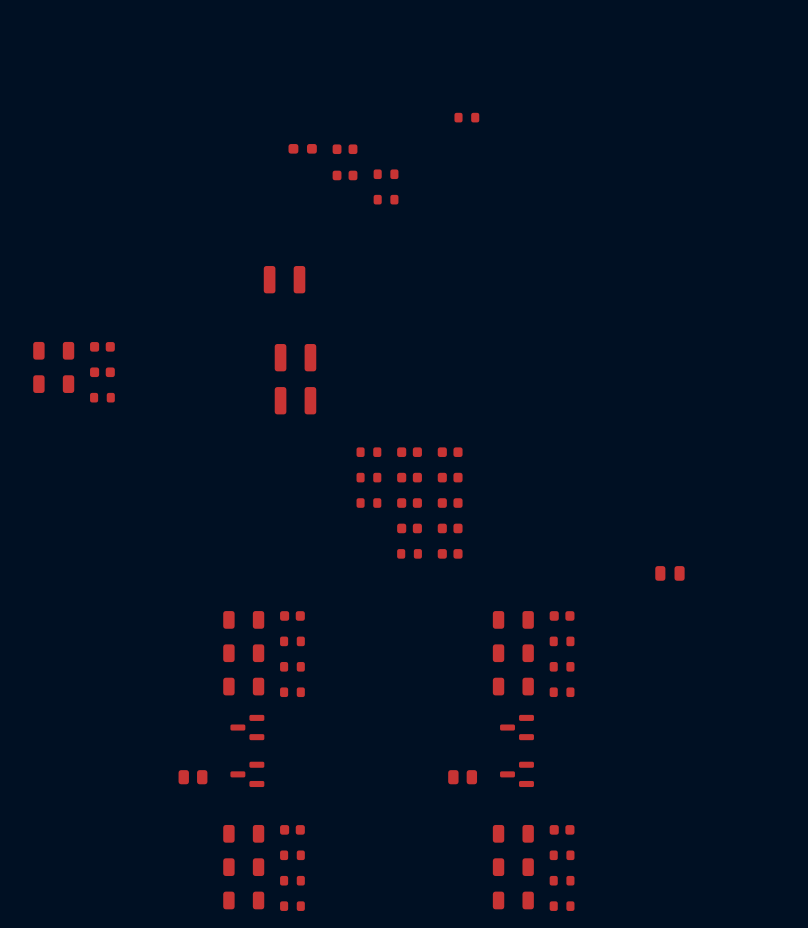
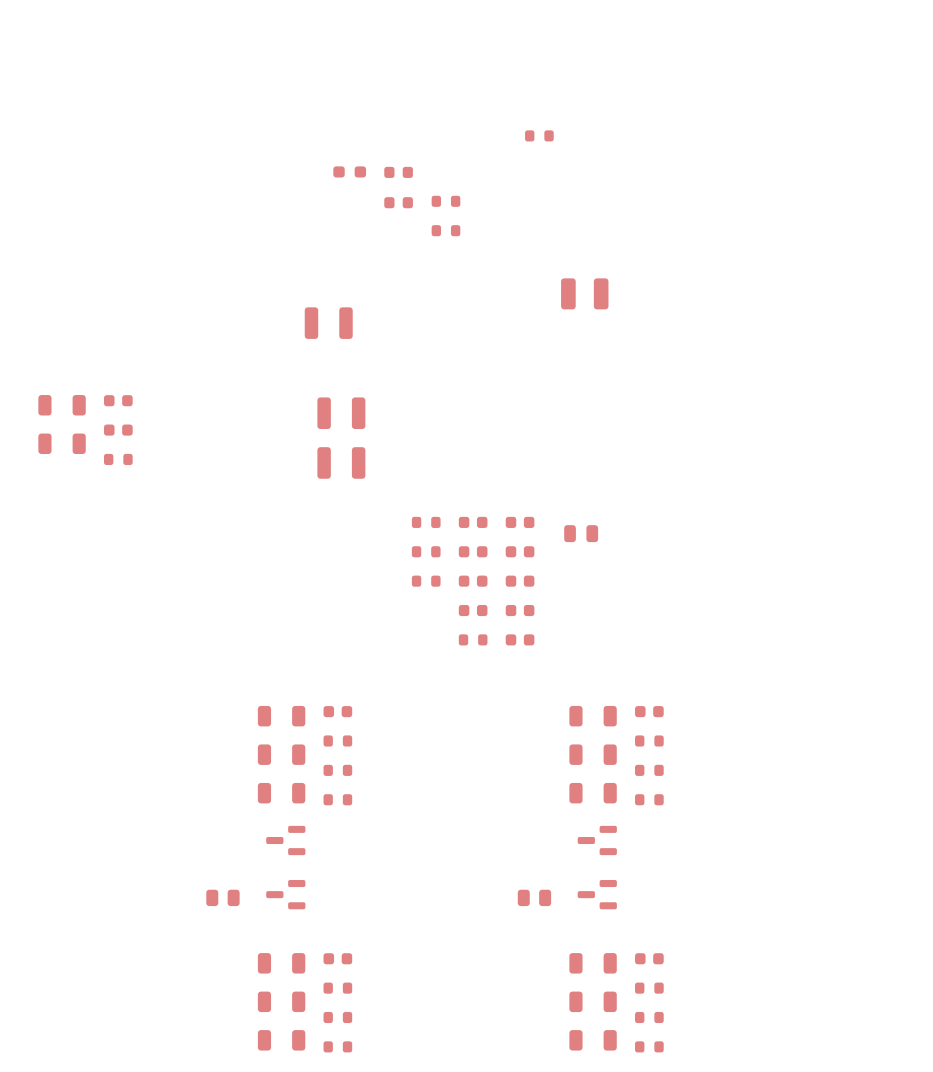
part: none -> (584, 293)
part position: (669, 573) -> (581, 533)

